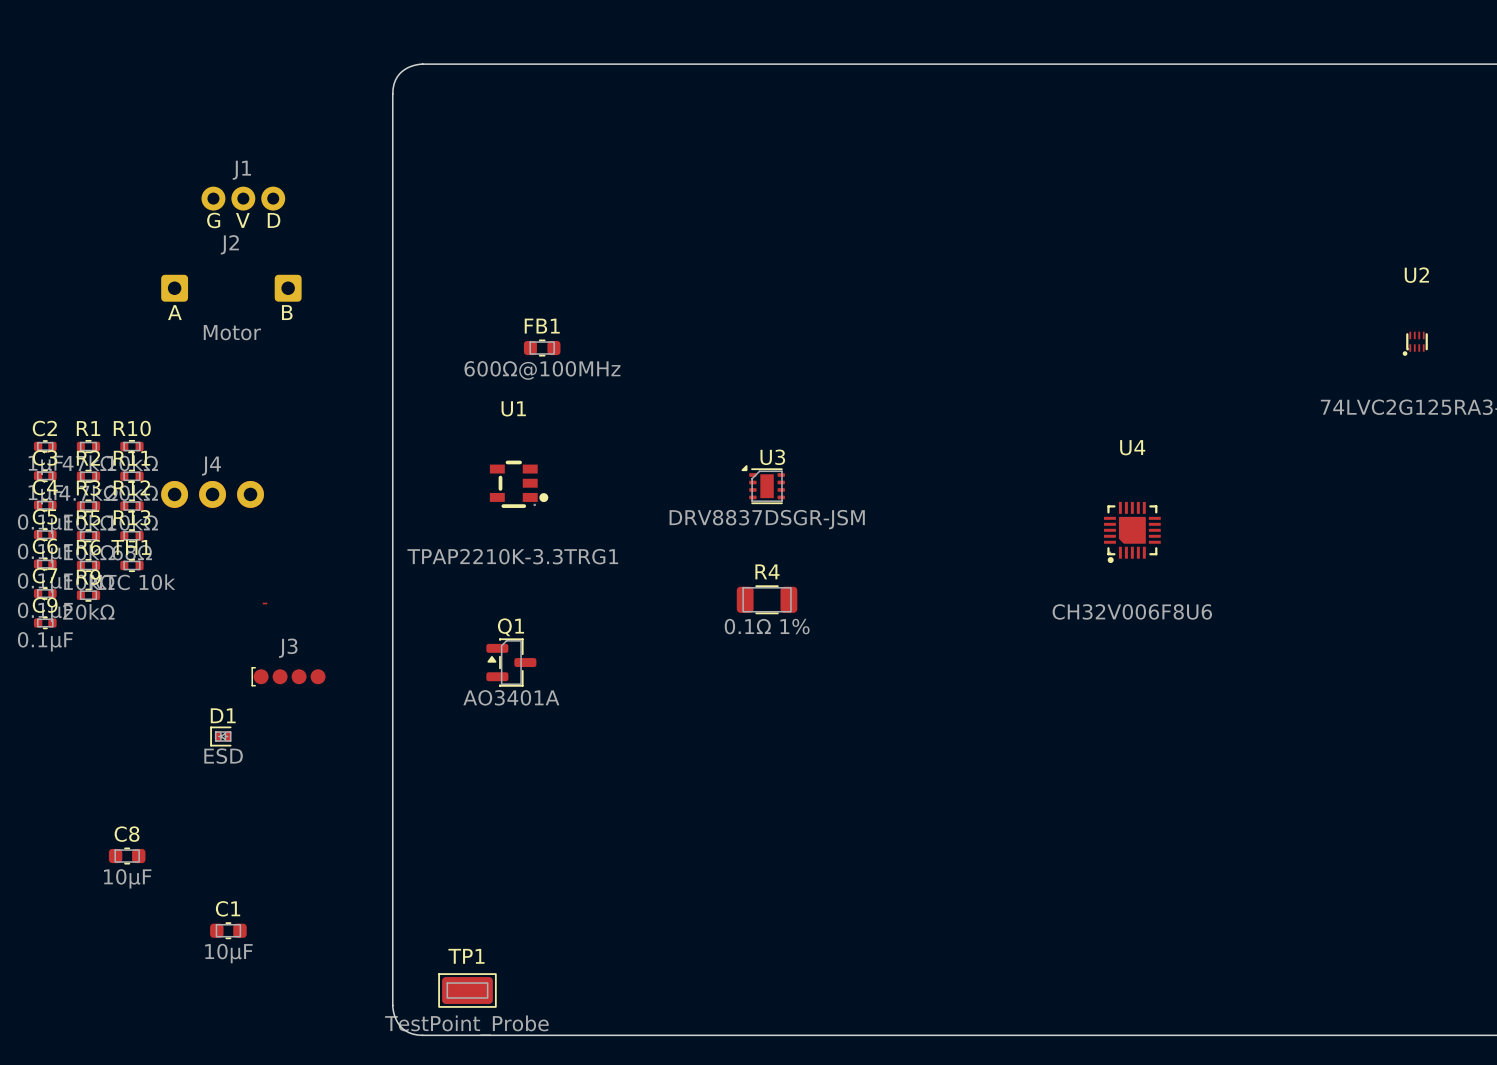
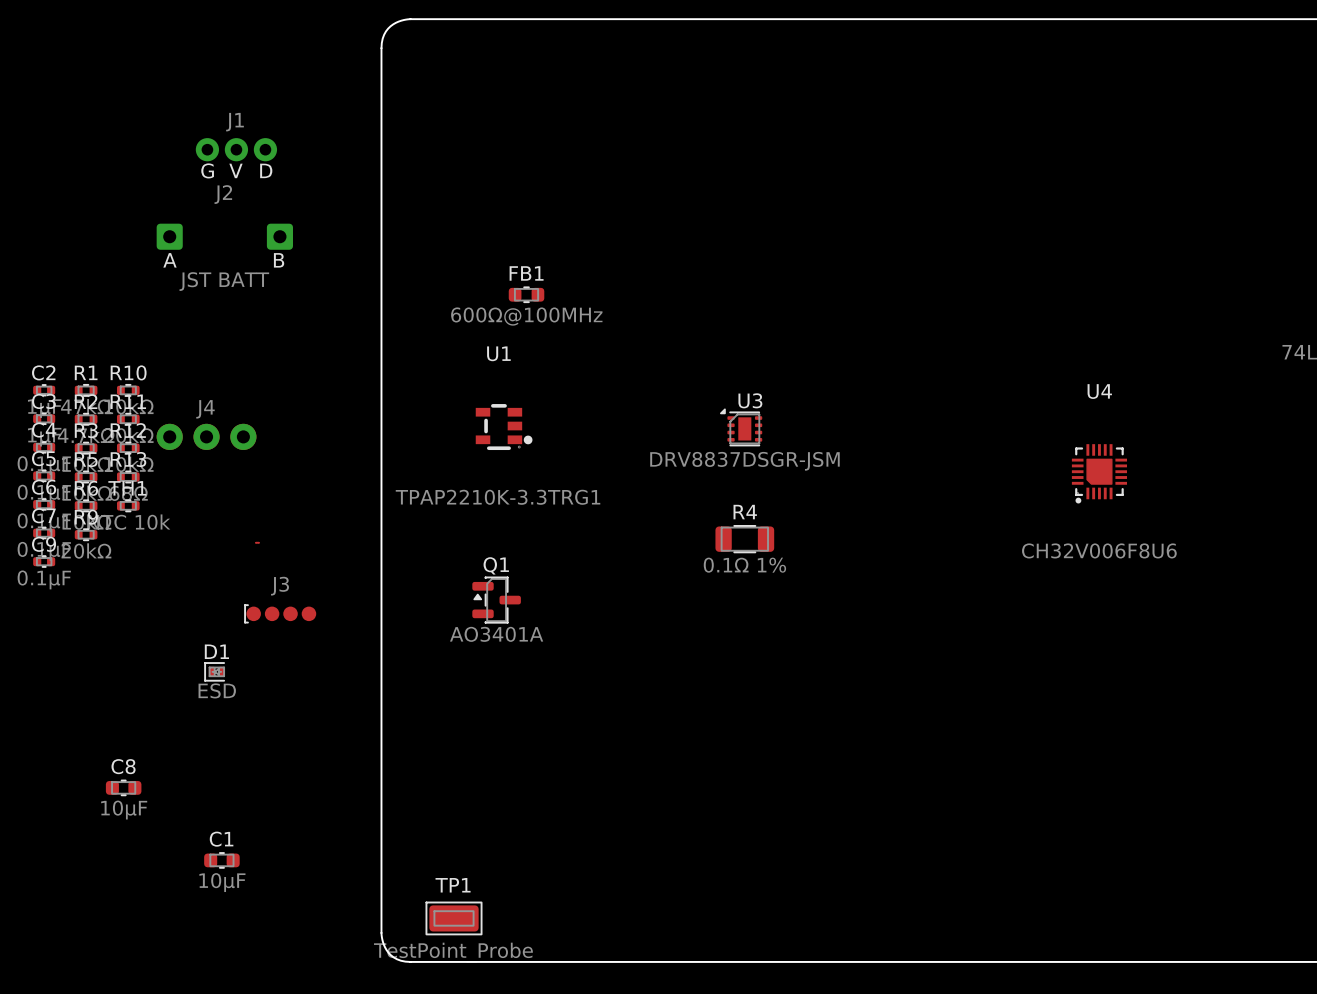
J2 value: Motor (232, 332) -> JST BATT (224, 281)

